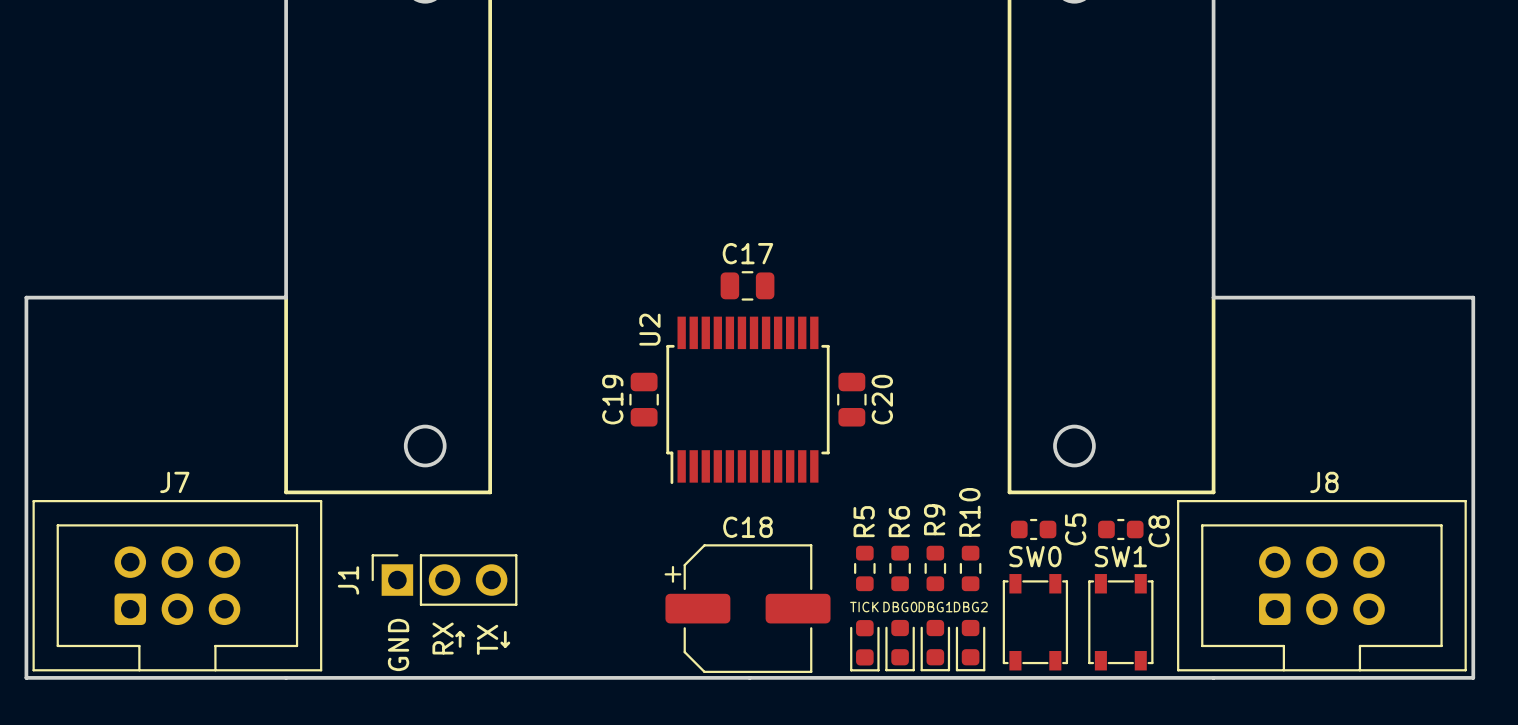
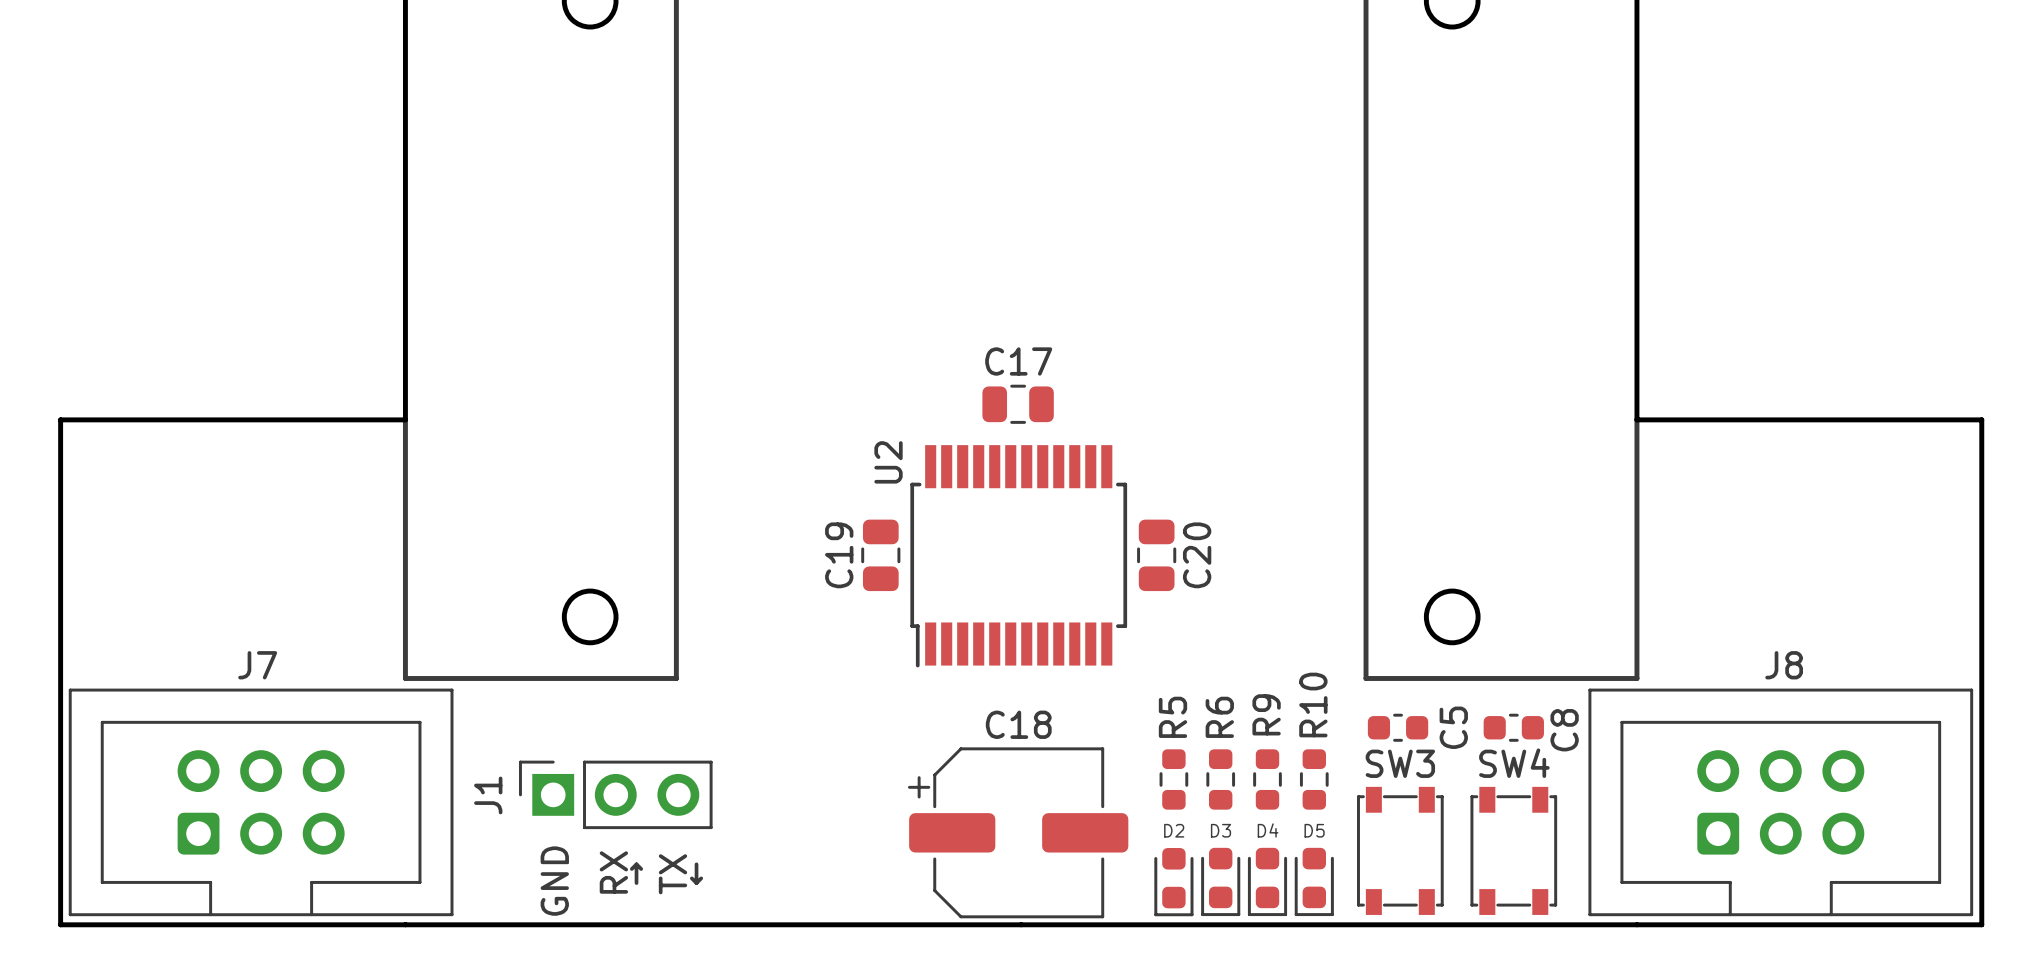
SW0 name: SW0 (1035, 556) -> SW3 (1400, 763)
SW1 name: SW1 (1120, 556) -> SW4 (1514, 763)
TICK name: TICK (864, 607) -> D2 (1174, 830)
DBG0 name: DBG0 (900, 607) -> D3 (1220, 830)
DBG1 name: DBG1 (935, 607) -> D4 (1268, 830)
DBG2 name: DBG2 (970, 607) -> D5 (1314, 830)

